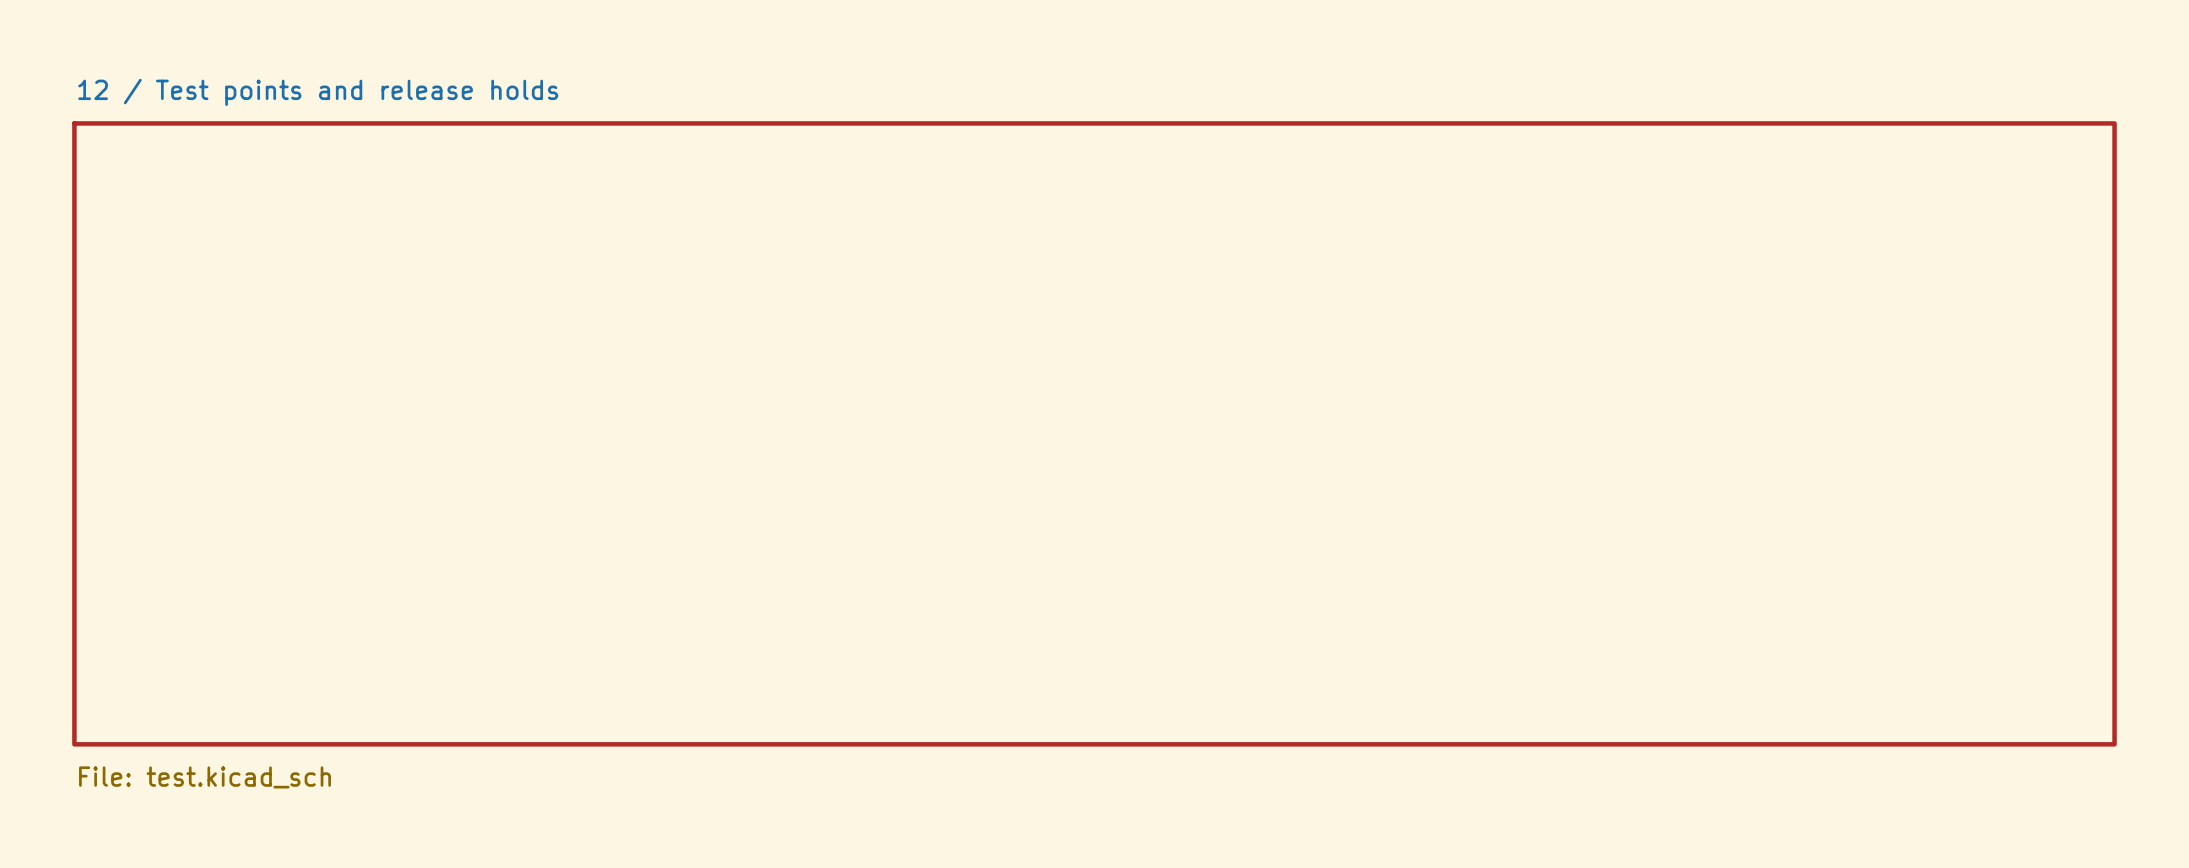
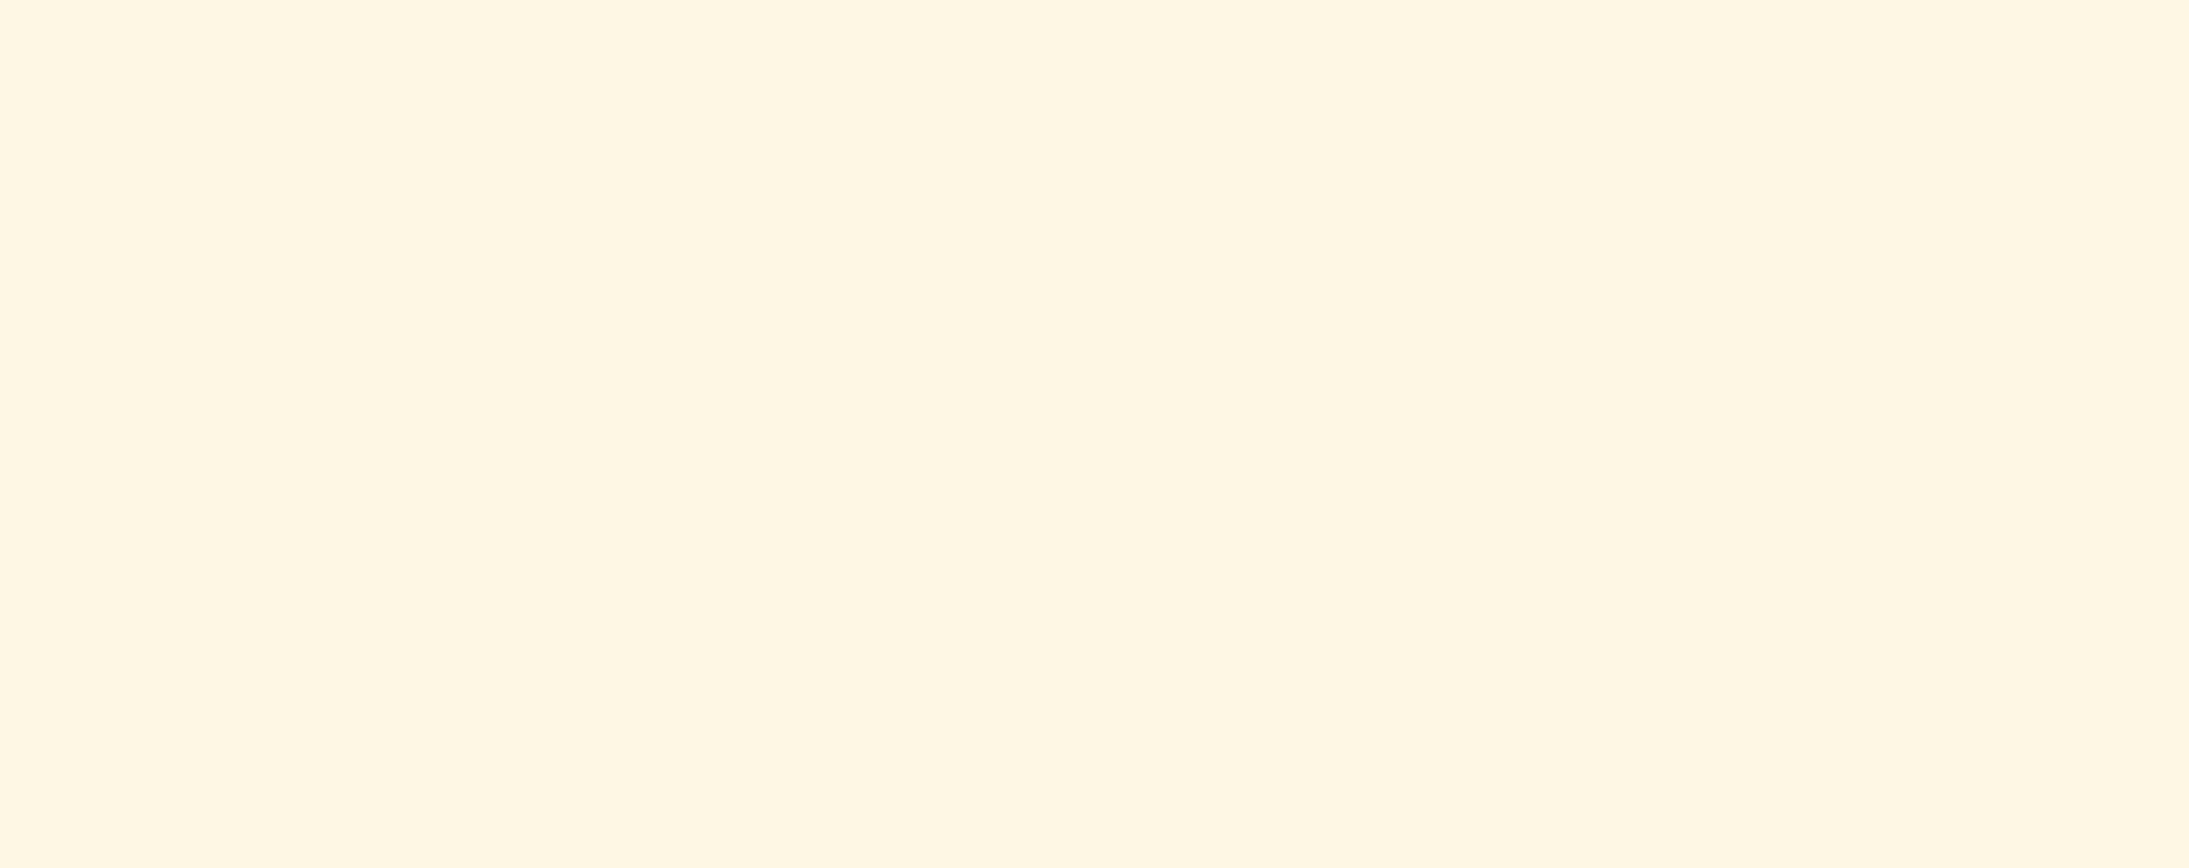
sheet 12 / Test points and release holds: File: test.kicad_sch (1094, 433) -> none

